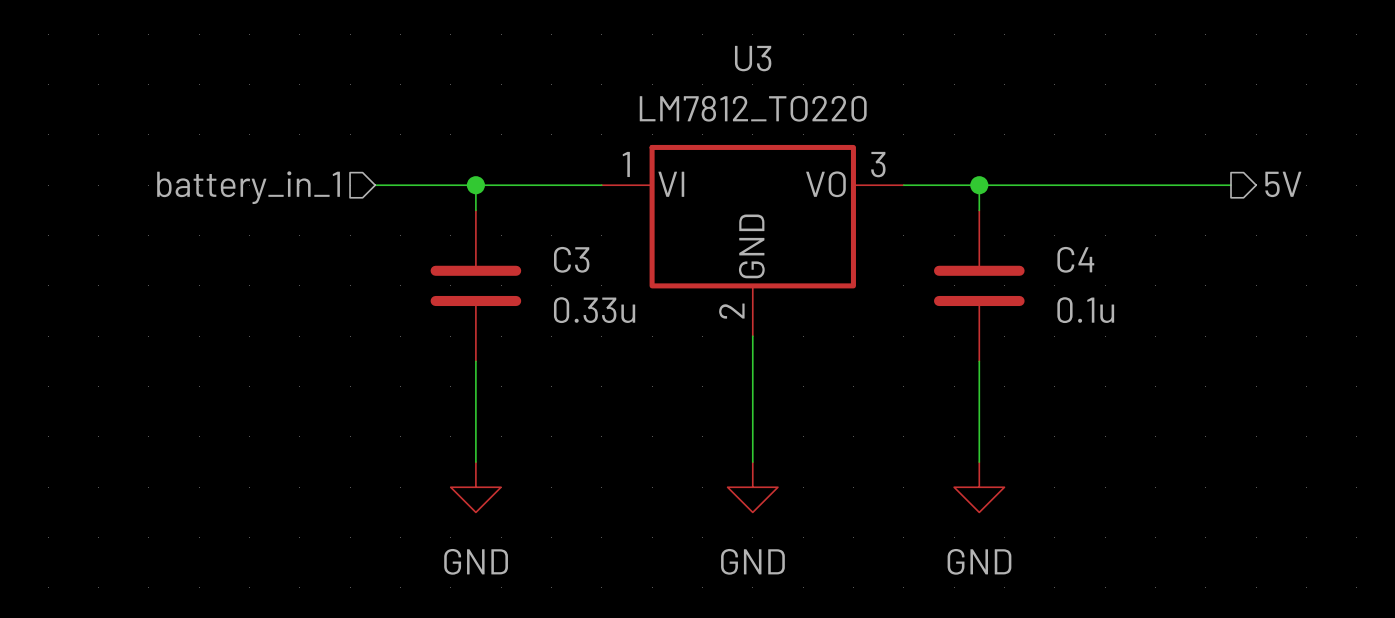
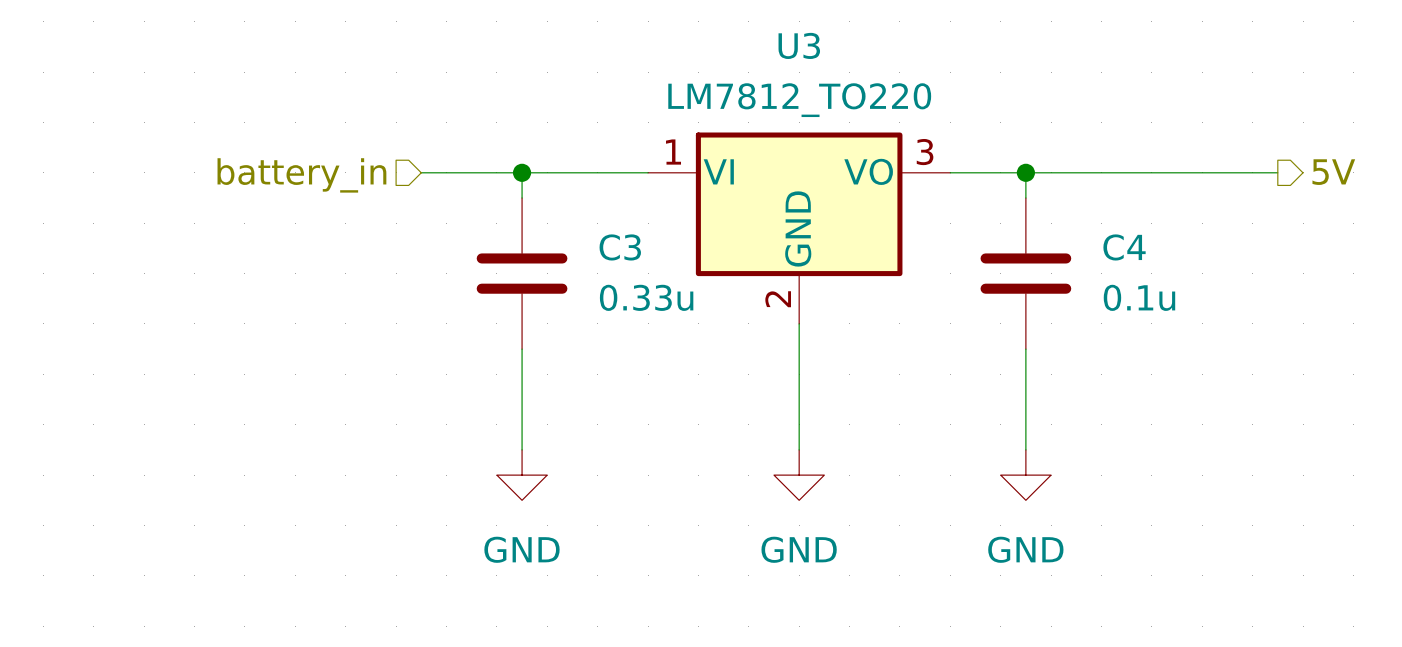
hierarchical label: battery_in_1 (248, 187) -> battery_in (301, 175)

